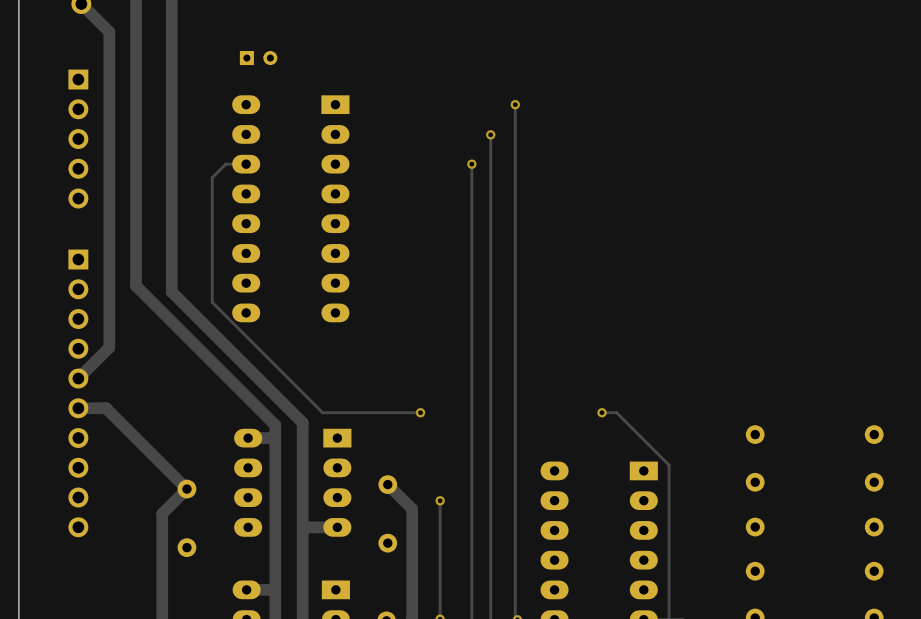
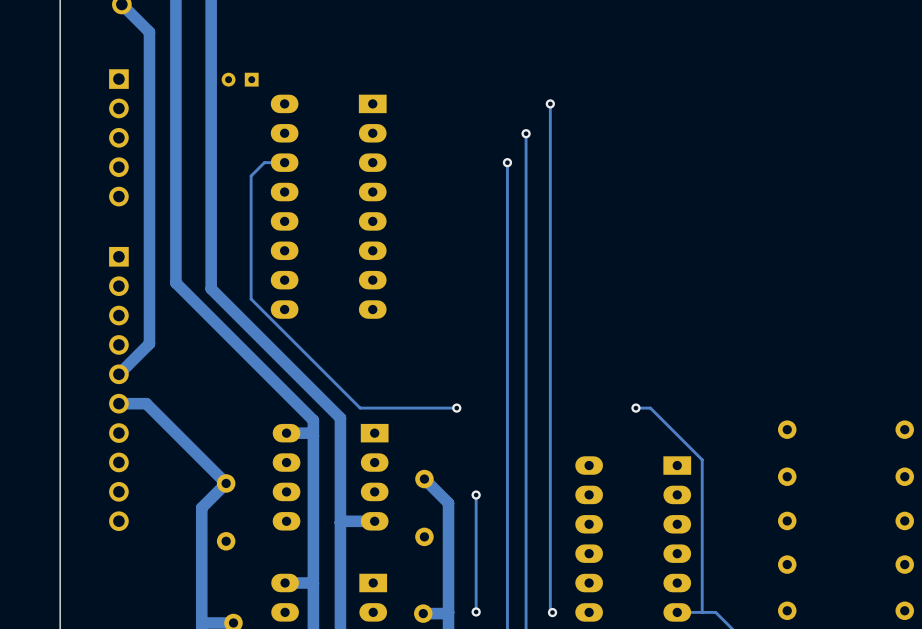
part rotation: 0° (258, 58) -> 180° (240, 79)
part position: (258, 58) -> (240, 79)

